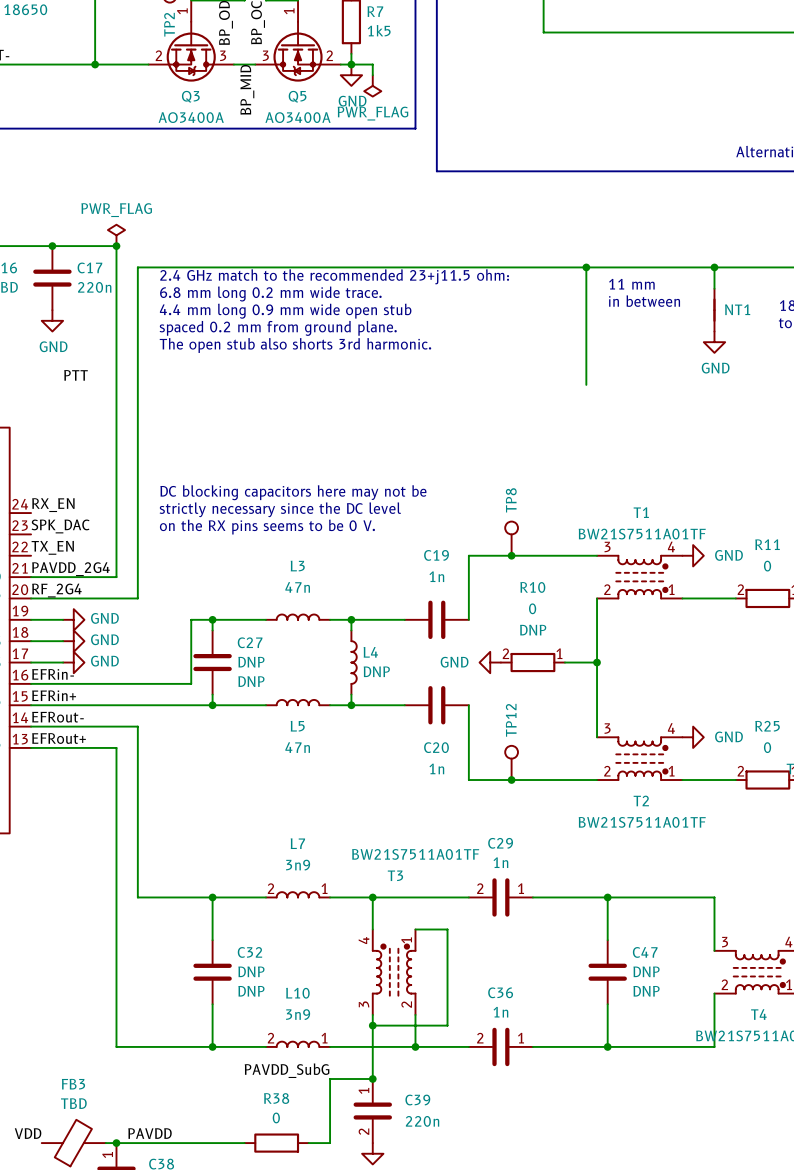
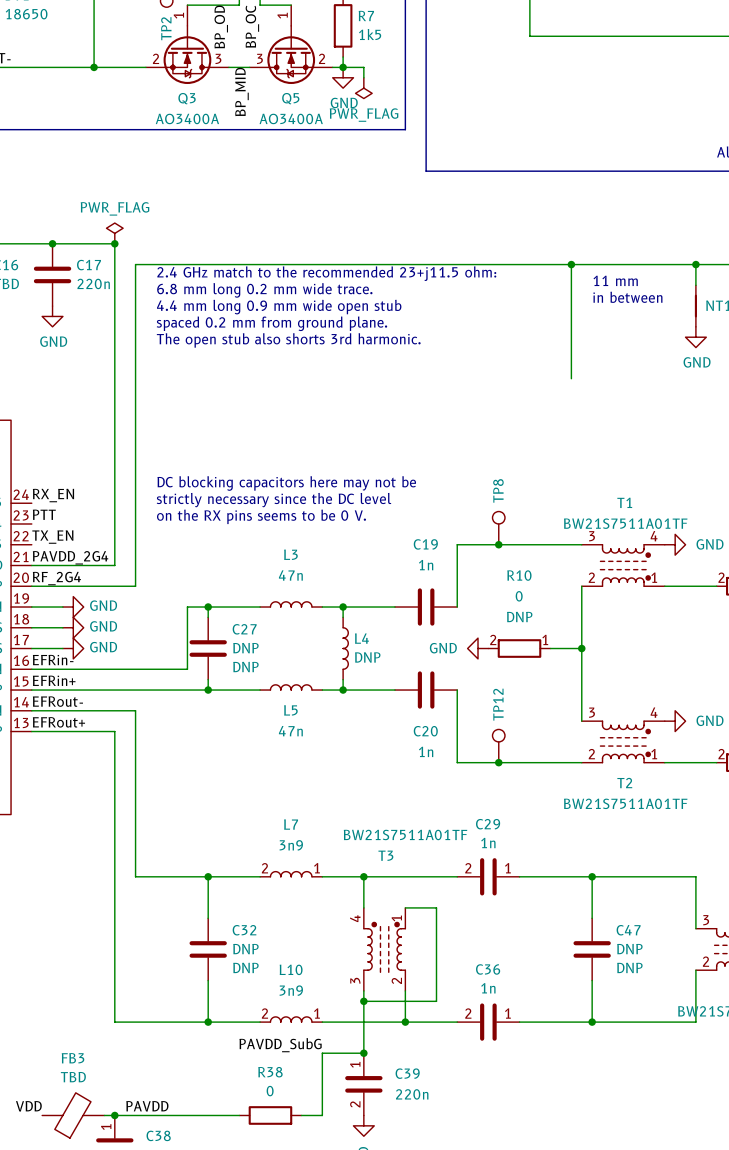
label: PTT (75, 375) -> none
label: SPK_DAC (60, 526) -> PTT (44, 514)

